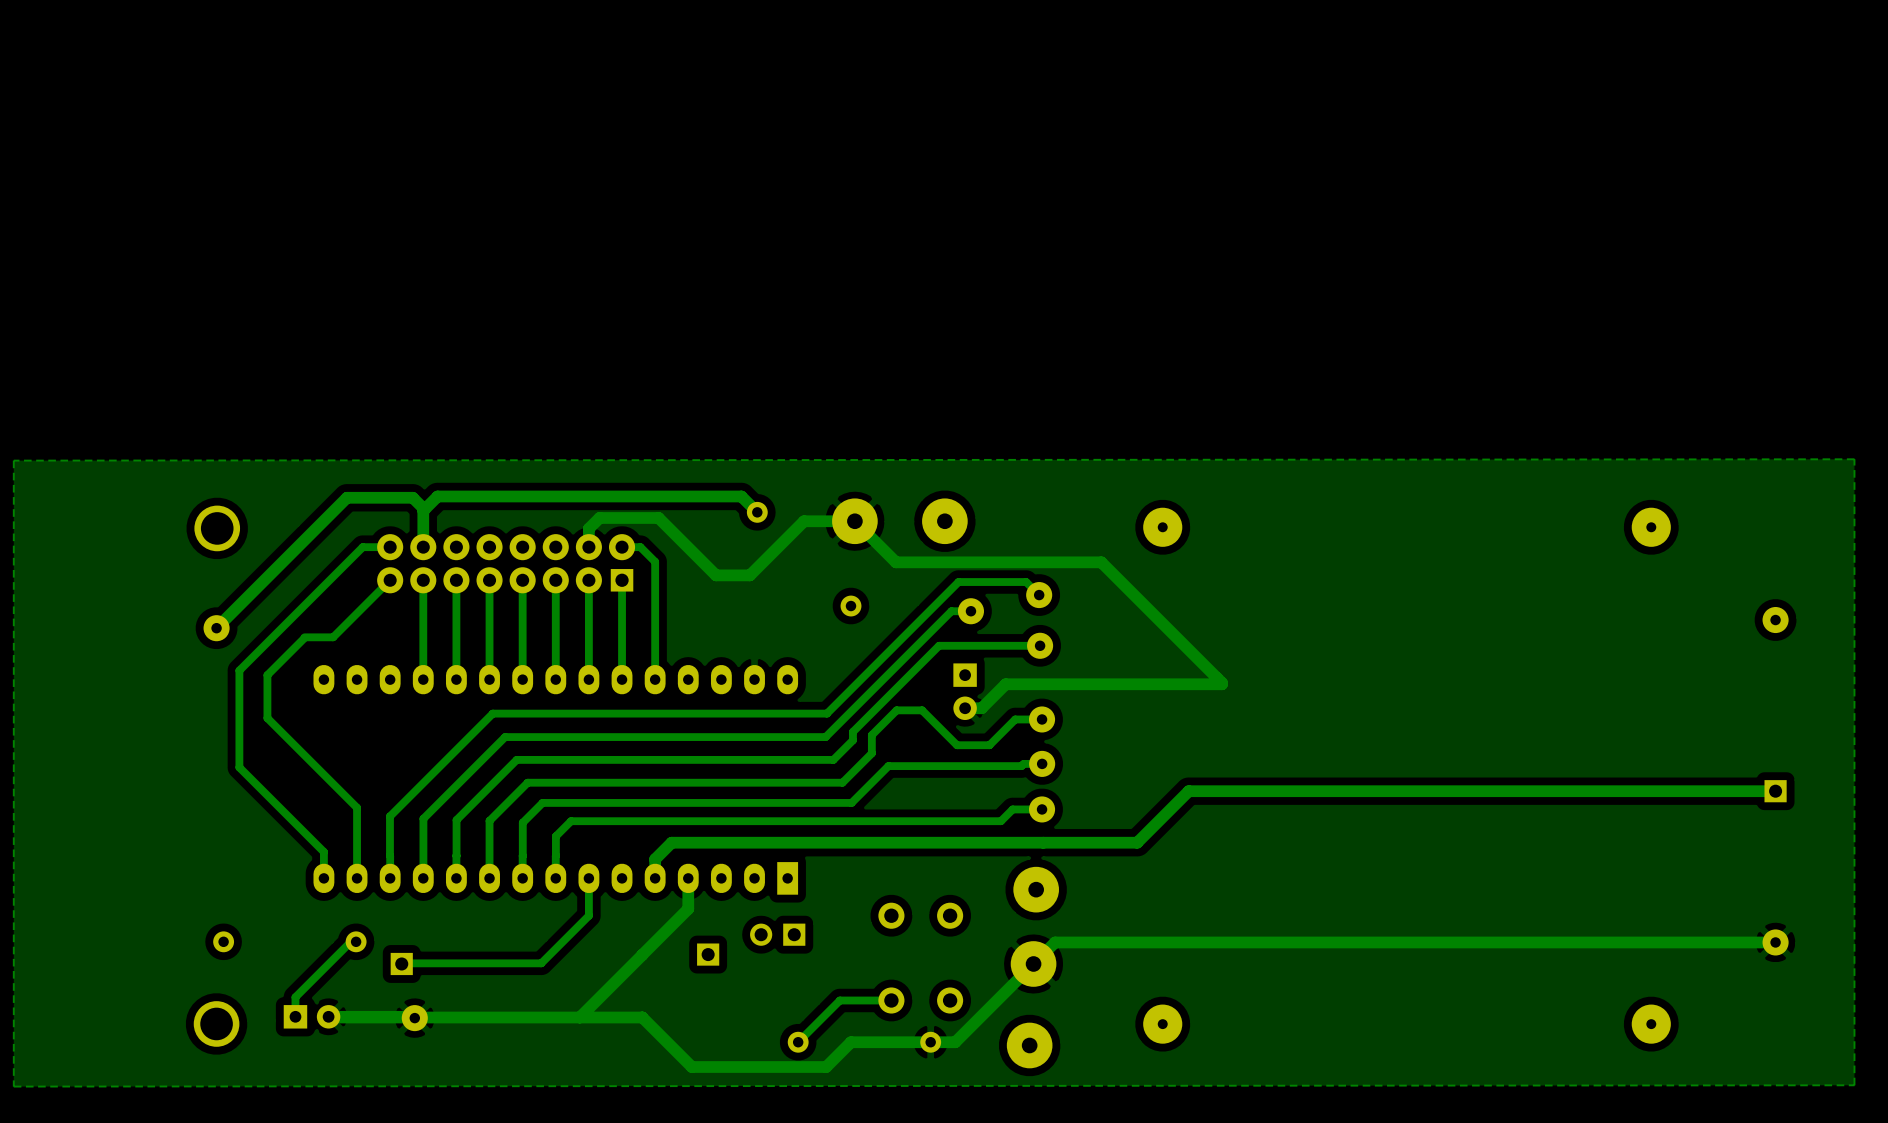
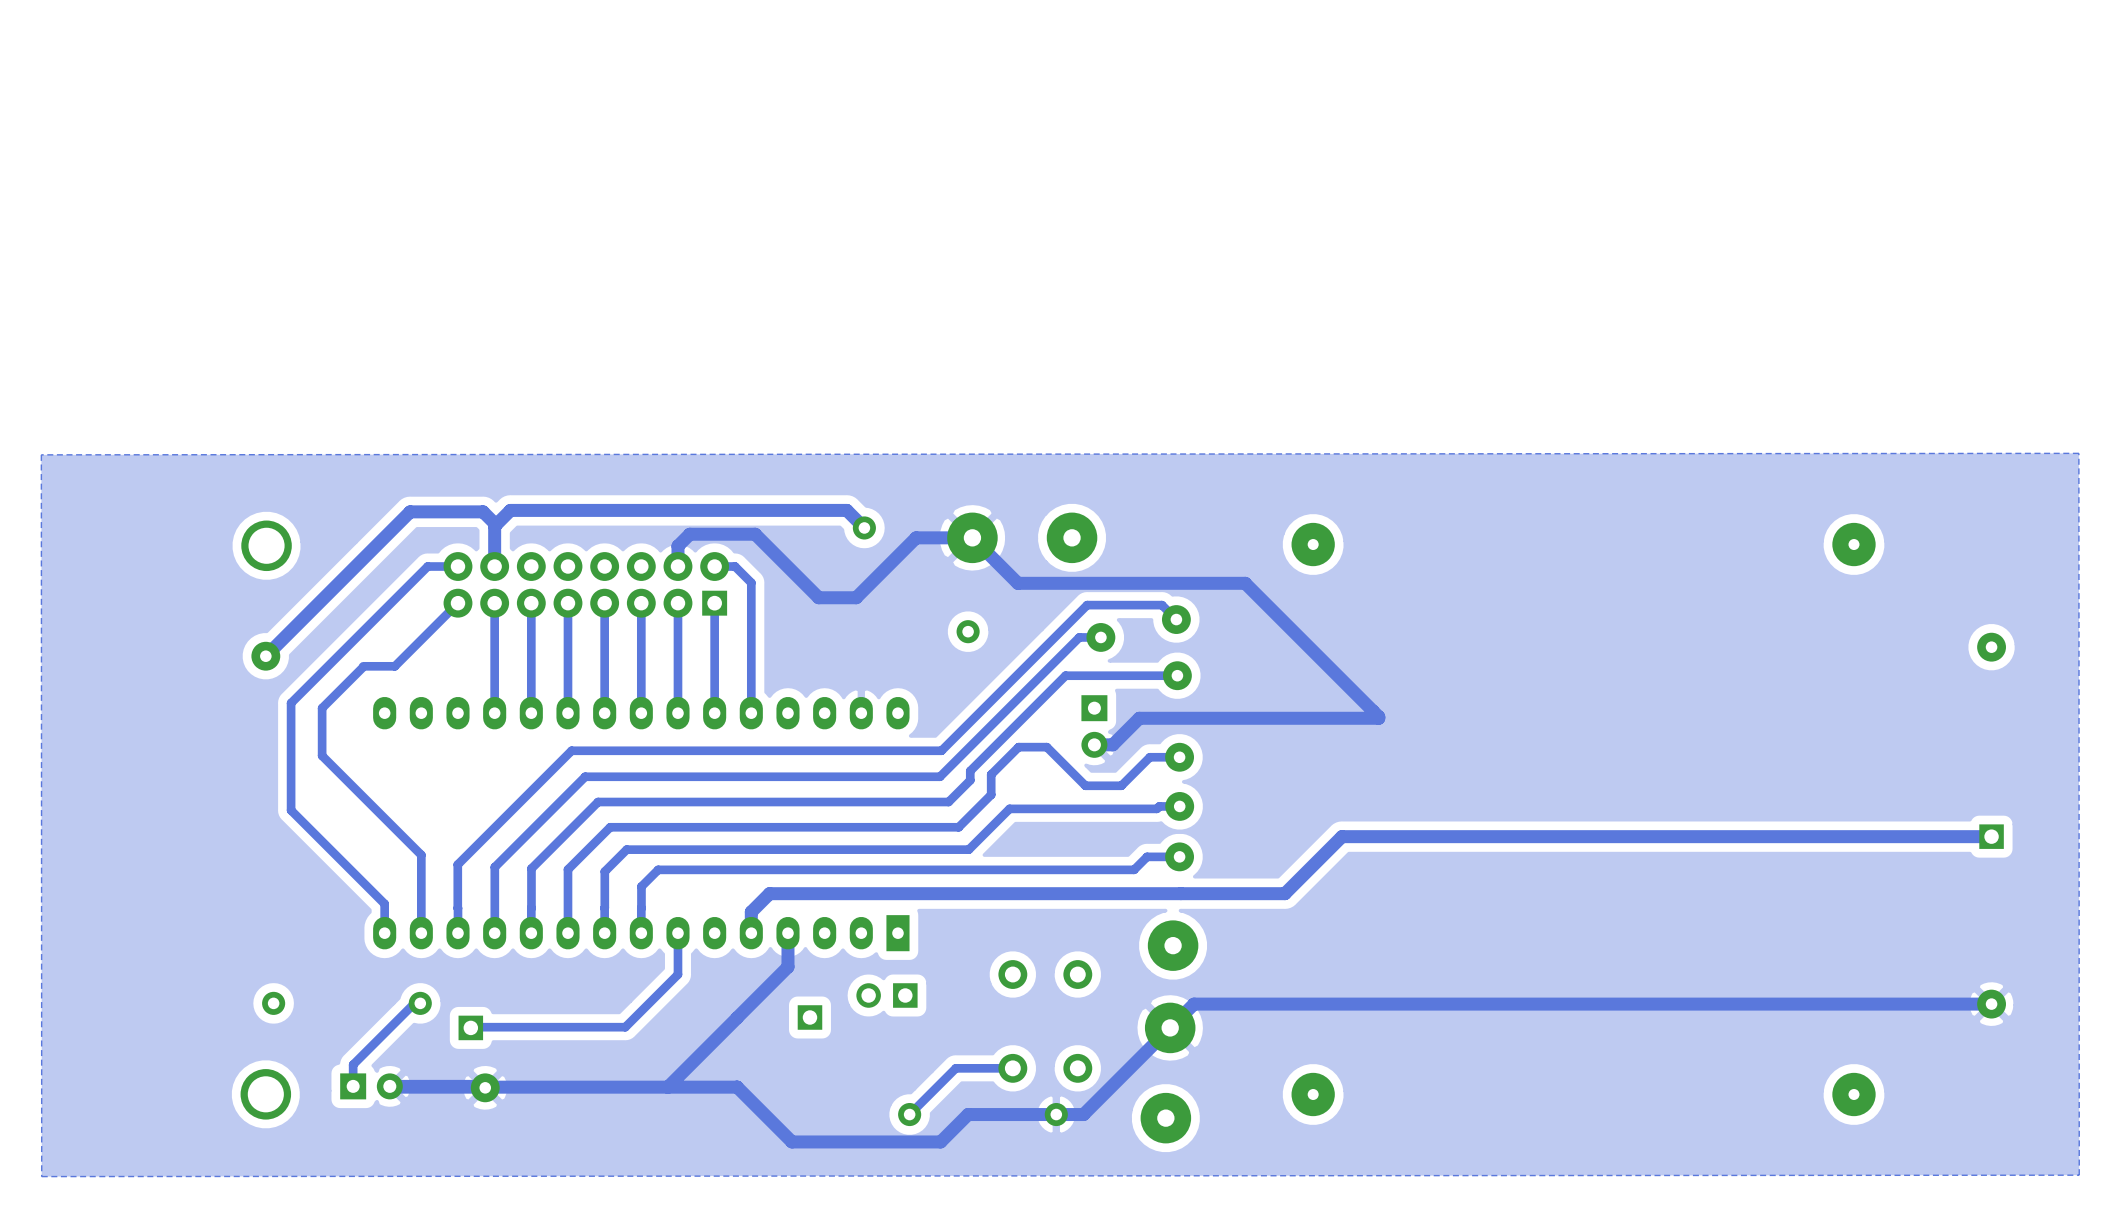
zone outline: (1854, 459) (13, 460) (13, 1086) (1854, 1085) (1854, 459) -> (2078, 453) (2079, 1175) (41, 1176) (41, 454) (2078, 453)

